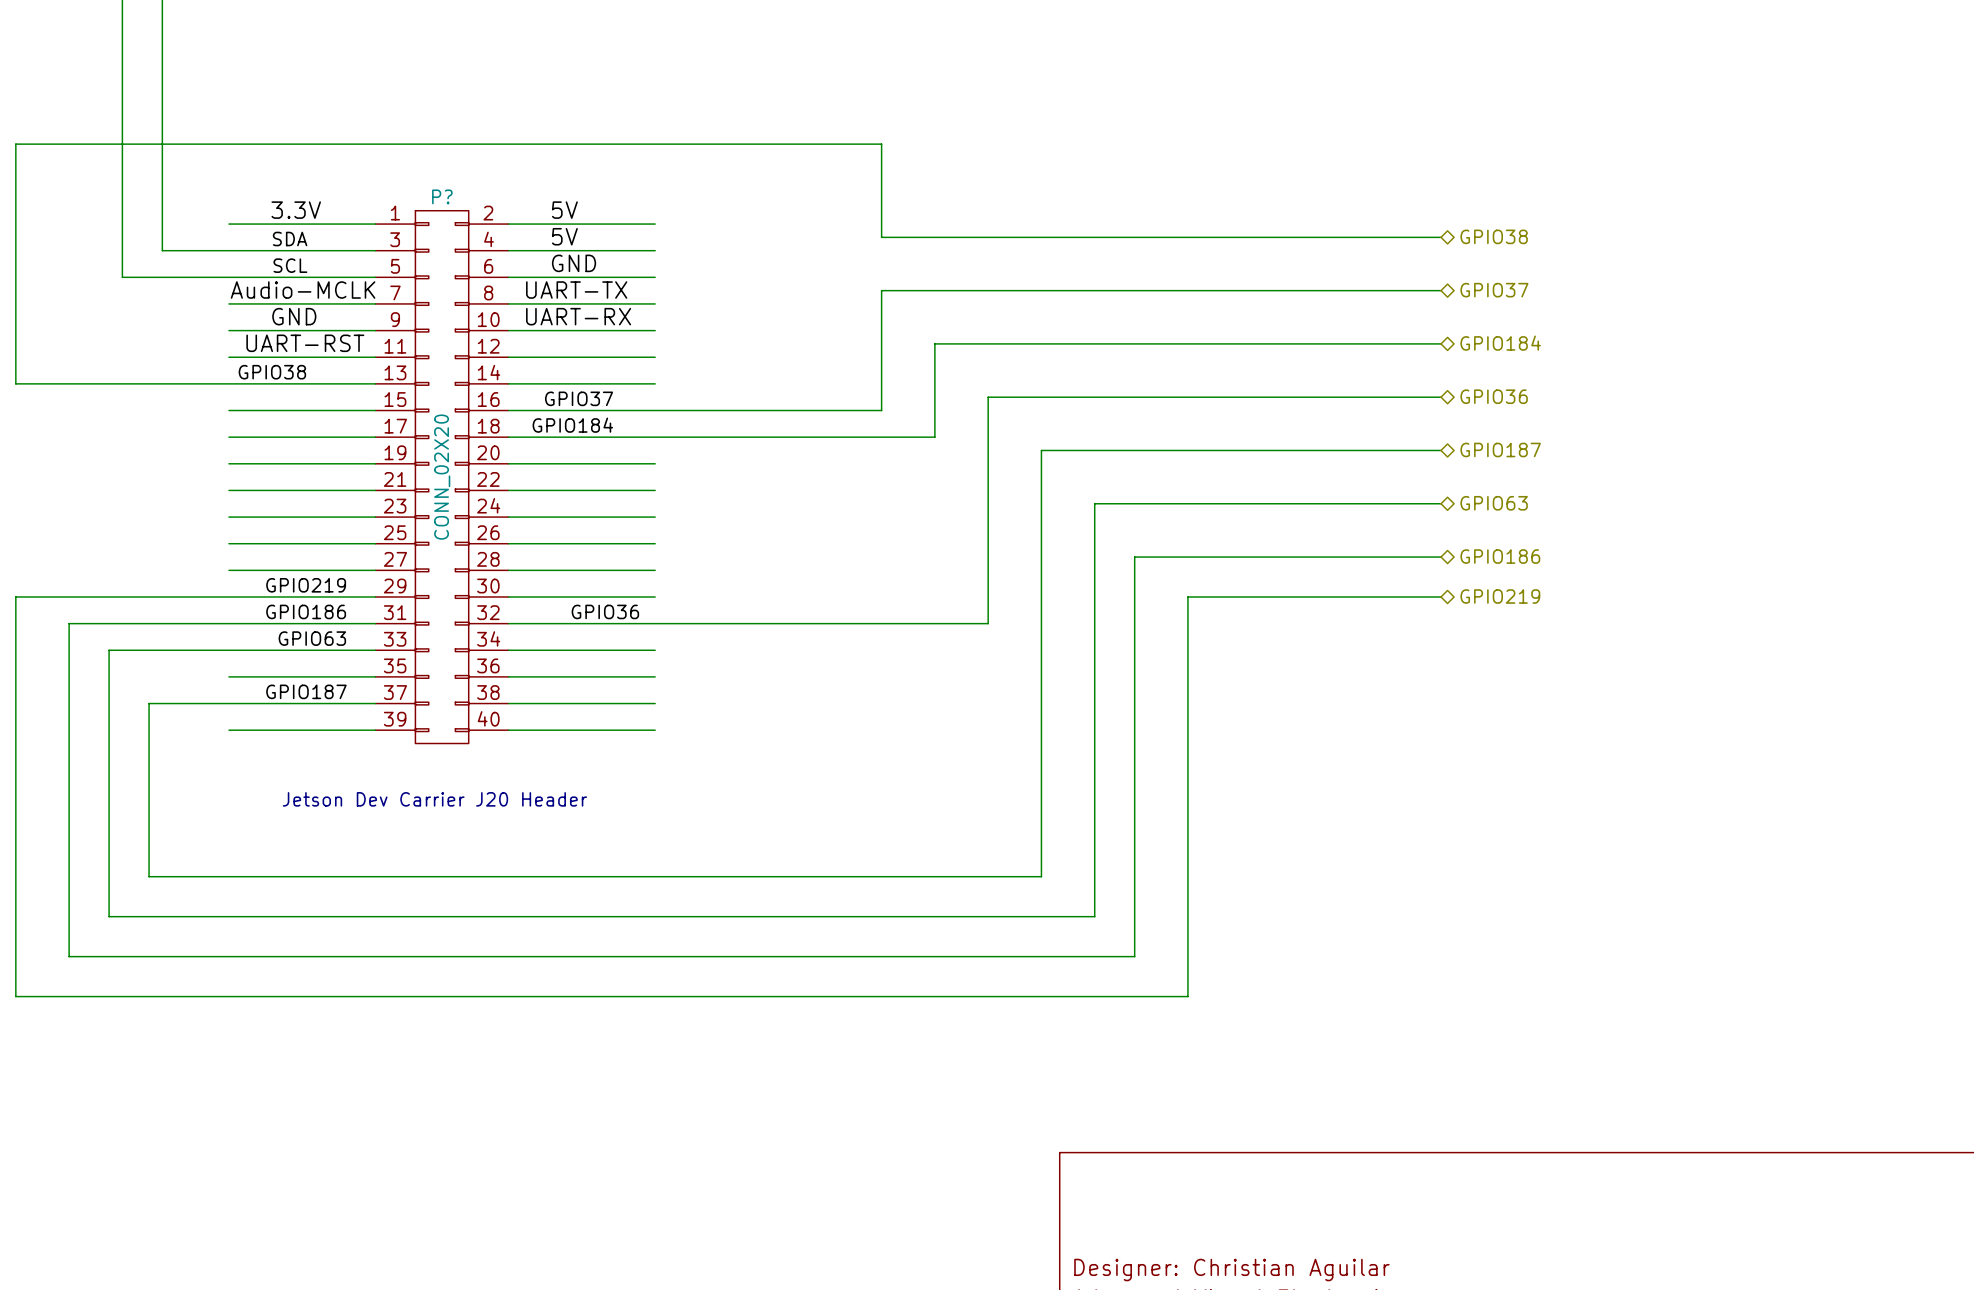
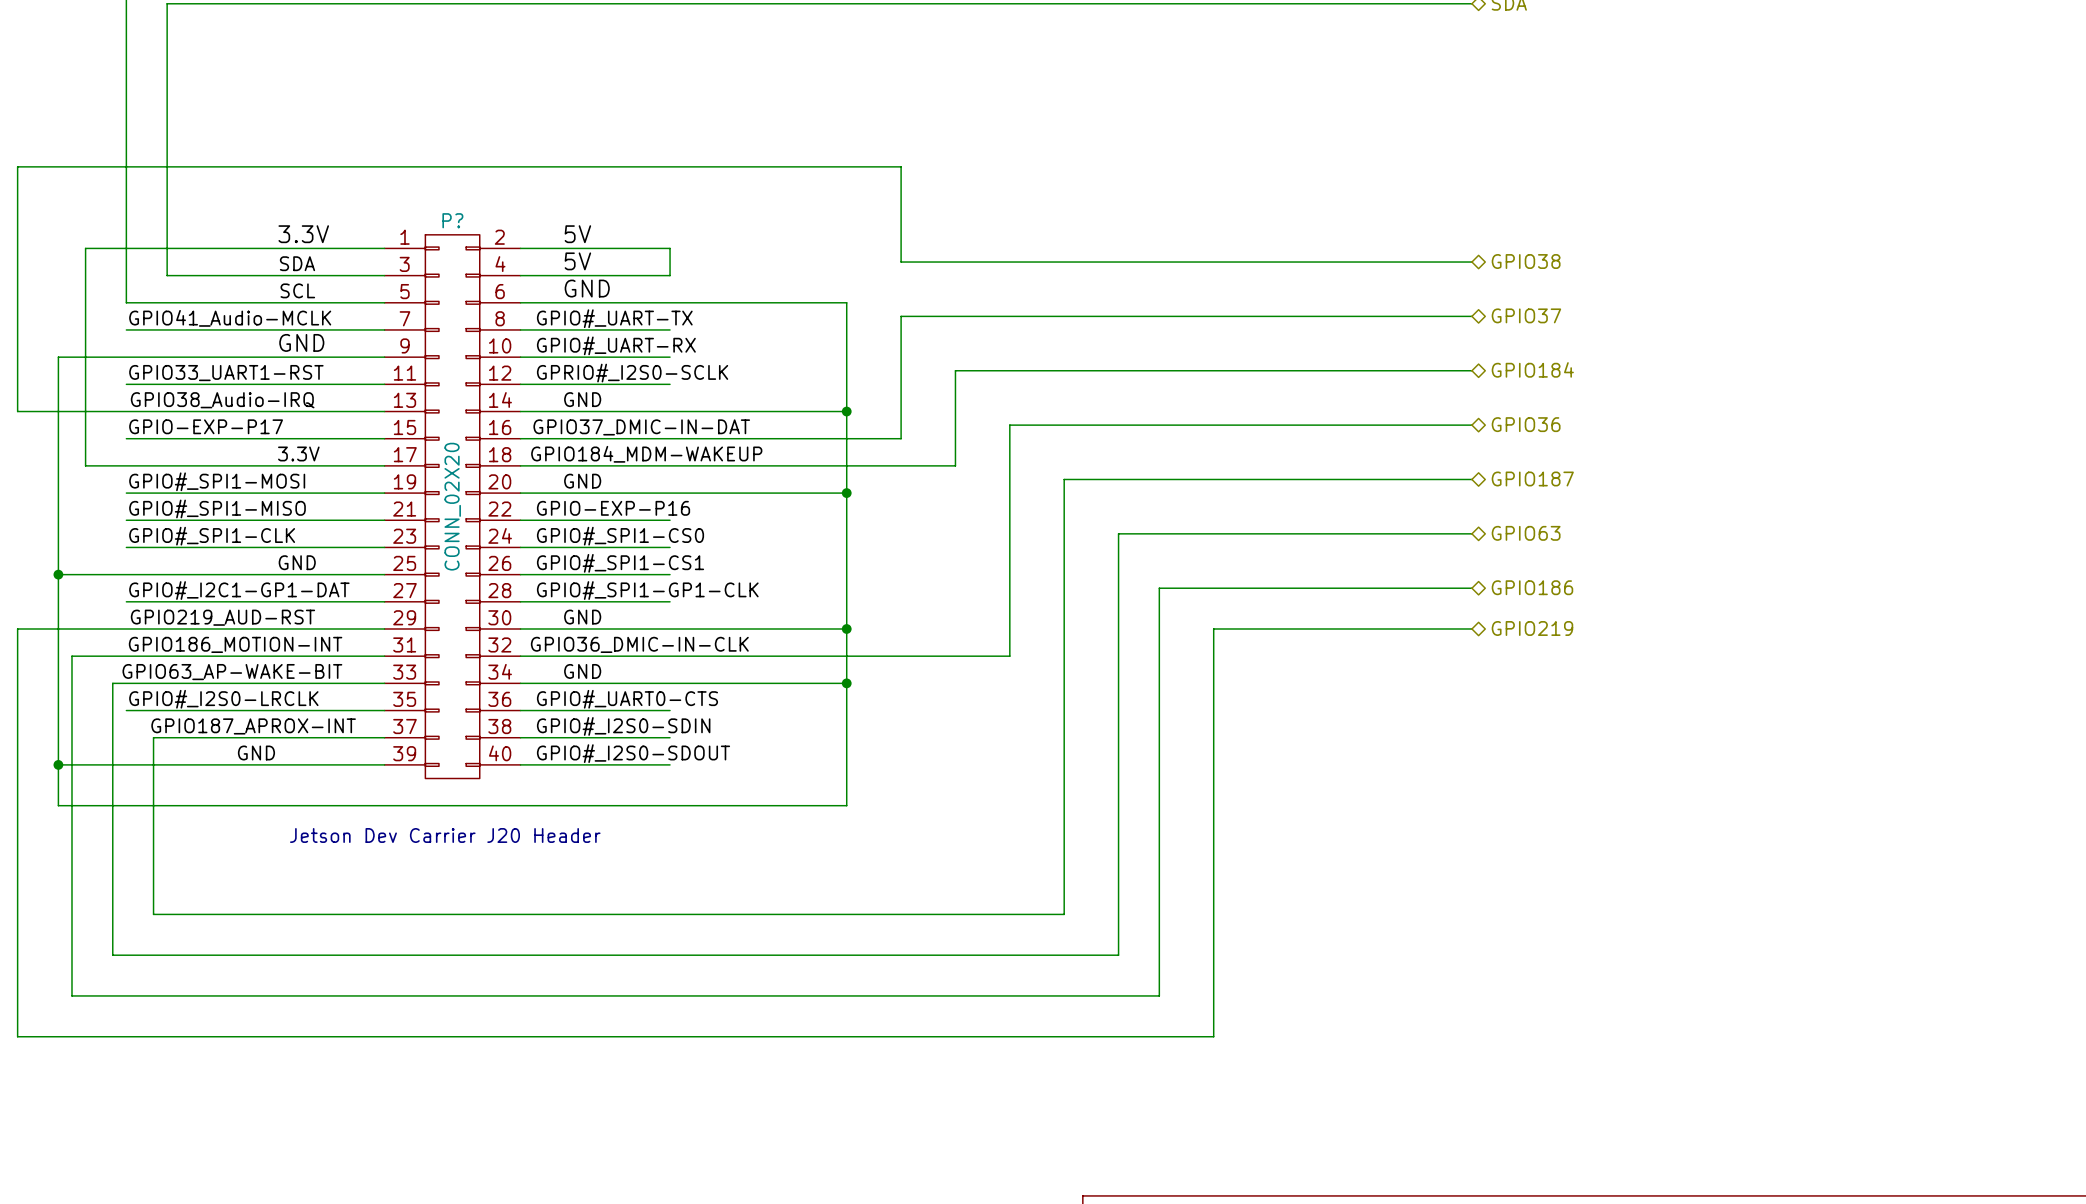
wire: none -> (235, 248) (85, 248) (85, 465) (235, 465)
wire: none -> (670, 248) (670, 275)
wire: none -> (670, 302) (846, 302) (846, 805) (58, 805) (58, 357) (235, 357)
label: Audio-MCLK (303, 290) -> GPIO41_Audio-MCLK (230, 318)
label: UART-TX (576, 290) -> GPIO#_UART-TX (614, 318)
wire: none -> (126, 329) (235, 329)
label: UART-RX (578, 316) -> GPIO#_UART-RX (616, 345)
label: UART-RST (305, 343) -> GPIO33_UART1-RST (226, 373)
label: none -> GPRIO#_I2S0-SCLK (632, 373)
wire: none -> (126, 384) (235, 384)
label: GPIO38 (272, 372) -> GPIO38_Audio-IRQ (222, 400)
label: none -> GND (582, 399)
wire: none -> (670, 411) (846, 411)
junction: none -> (846, 411)
label: none -> GPIO-EXP-P17 (206, 426)
label: GPIO37 (579, 398) -> none
label: none -> GPIO37_DMIC-IN-DAT (641, 427)
wire: none -> (126, 438) (235, 438)
label: none -> 3.3V (298, 453)
label: GPIO184 (572, 425) -> none
label: none -> GPIO184_MDM-WAKEUP (646, 454)
label: none -> GPIO#_SPI1-MOSI (217, 481)
label: none -> GND (582, 481)
wire: none -> (126, 493) (235, 493)
wire: none -> (670, 493) (846, 493)
junction: none -> (846, 493)
label: none -> GPIO-EXP-P16 (613, 508)
label: none -> GPIO#_SPI1-MISO (217, 508)
wire: none -> (126, 520) (235, 520)
label: none -> GPIO#_SPI1-CLK (212, 536)
label: none -> GPIO#_SPI1-CS0 (620, 536)
wire: none -> (126, 547) (235, 547)
label: none -> GND (297, 562)
label: none -> GPIO#_SPI1-CS1 (620, 563)
wire: none -> (58, 574) (235, 574)
junction: none -> (58, 574)
label: none -> GPIO#_I2C1-GP1-DAT (239, 590)
label: none -> GPIO#_SPI1-GP1-CLK (647, 590)
wire: none -> (126, 601) (235, 601)
label: GPIO219 (306, 585) -> GPIO219_AUD-RST (222, 617)
label: none -> GND (582, 617)
wire: none -> (670, 628) (846, 628)
junction: none -> (846, 628)
label: GPIO186 (306, 611) -> none
label: GPIO36 (605, 611) -> none
label: none -> GPIO186_MOTION-INT (235, 644)
label: none -> GPIO36_DMIC-IN-CLK (639, 644)
label: GPIO63 (312, 638) -> none
label: none -> GND (582, 671)
label: none -> GPIO63_AP-WAKE-BIT (232, 672)
wire: none -> (670, 683) (846, 683)
junction: none -> (846, 683)
label: none -> GPIO#_I2S0-LRCLK (223, 699)
label: none -> GPIO#_UART0-CTS (627, 699)
wire: none -> (126, 710) (235, 710)
label: GPIO187 (306, 691) -> GPIO187_APROX-INT (253, 726)
label: none -> GPIO#_I2S0-SDIN (623, 726)
label: none -> GND (256, 752)
label: none -> GPIO#_I2S0-SDOUT (633, 753)
wire: none -> (58, 764) (235, 764)
junction: none -> (58, 764)

